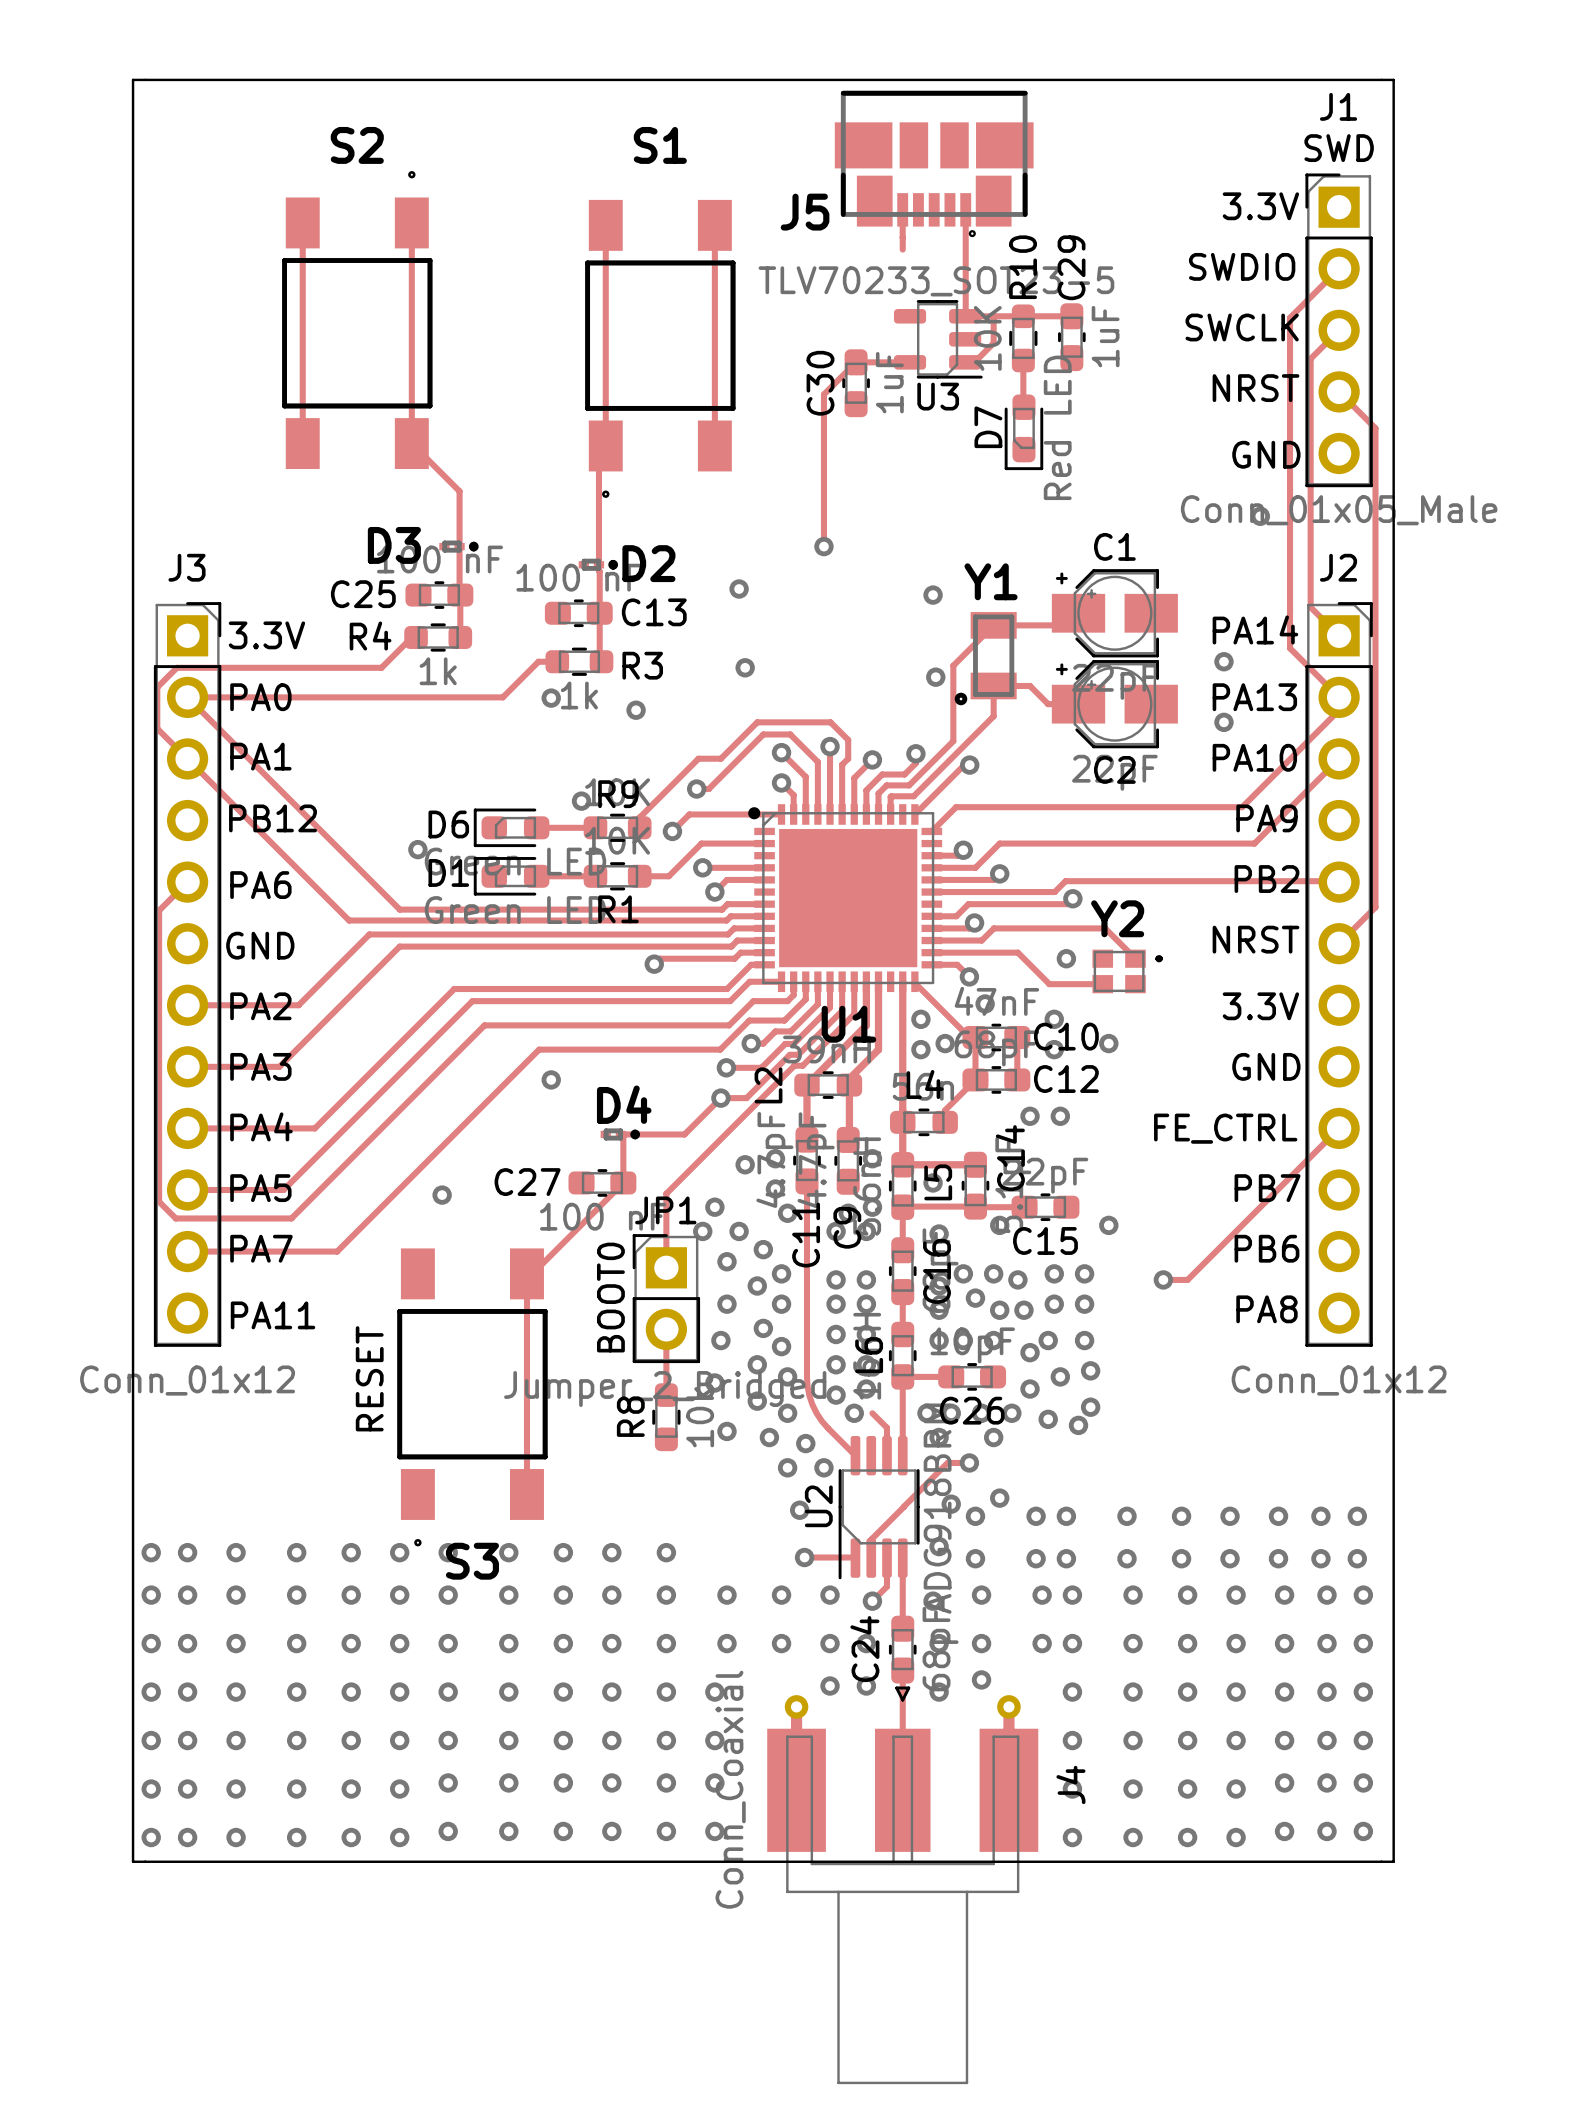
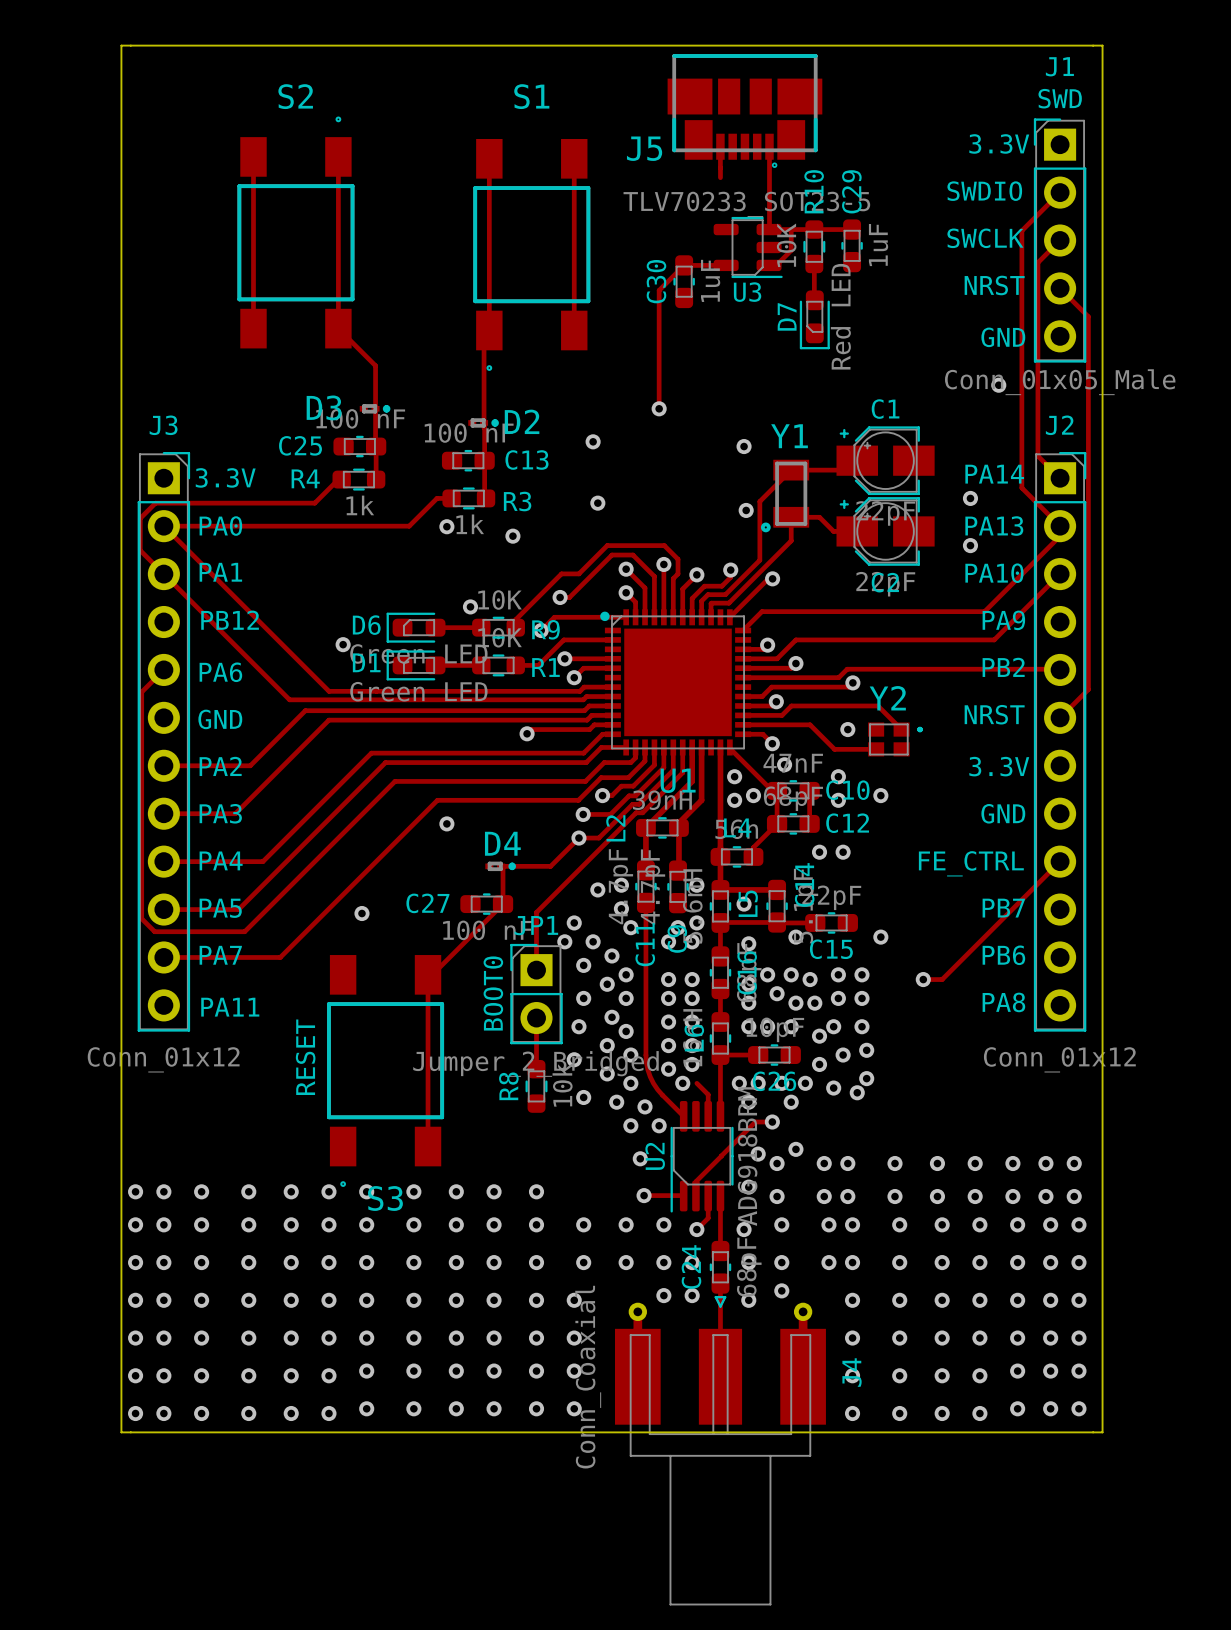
R9 name position: R9 (618, 794) -> R9 (545, 629)
R1 name position: R1 (618, 909) -> R1 (545, 667)

